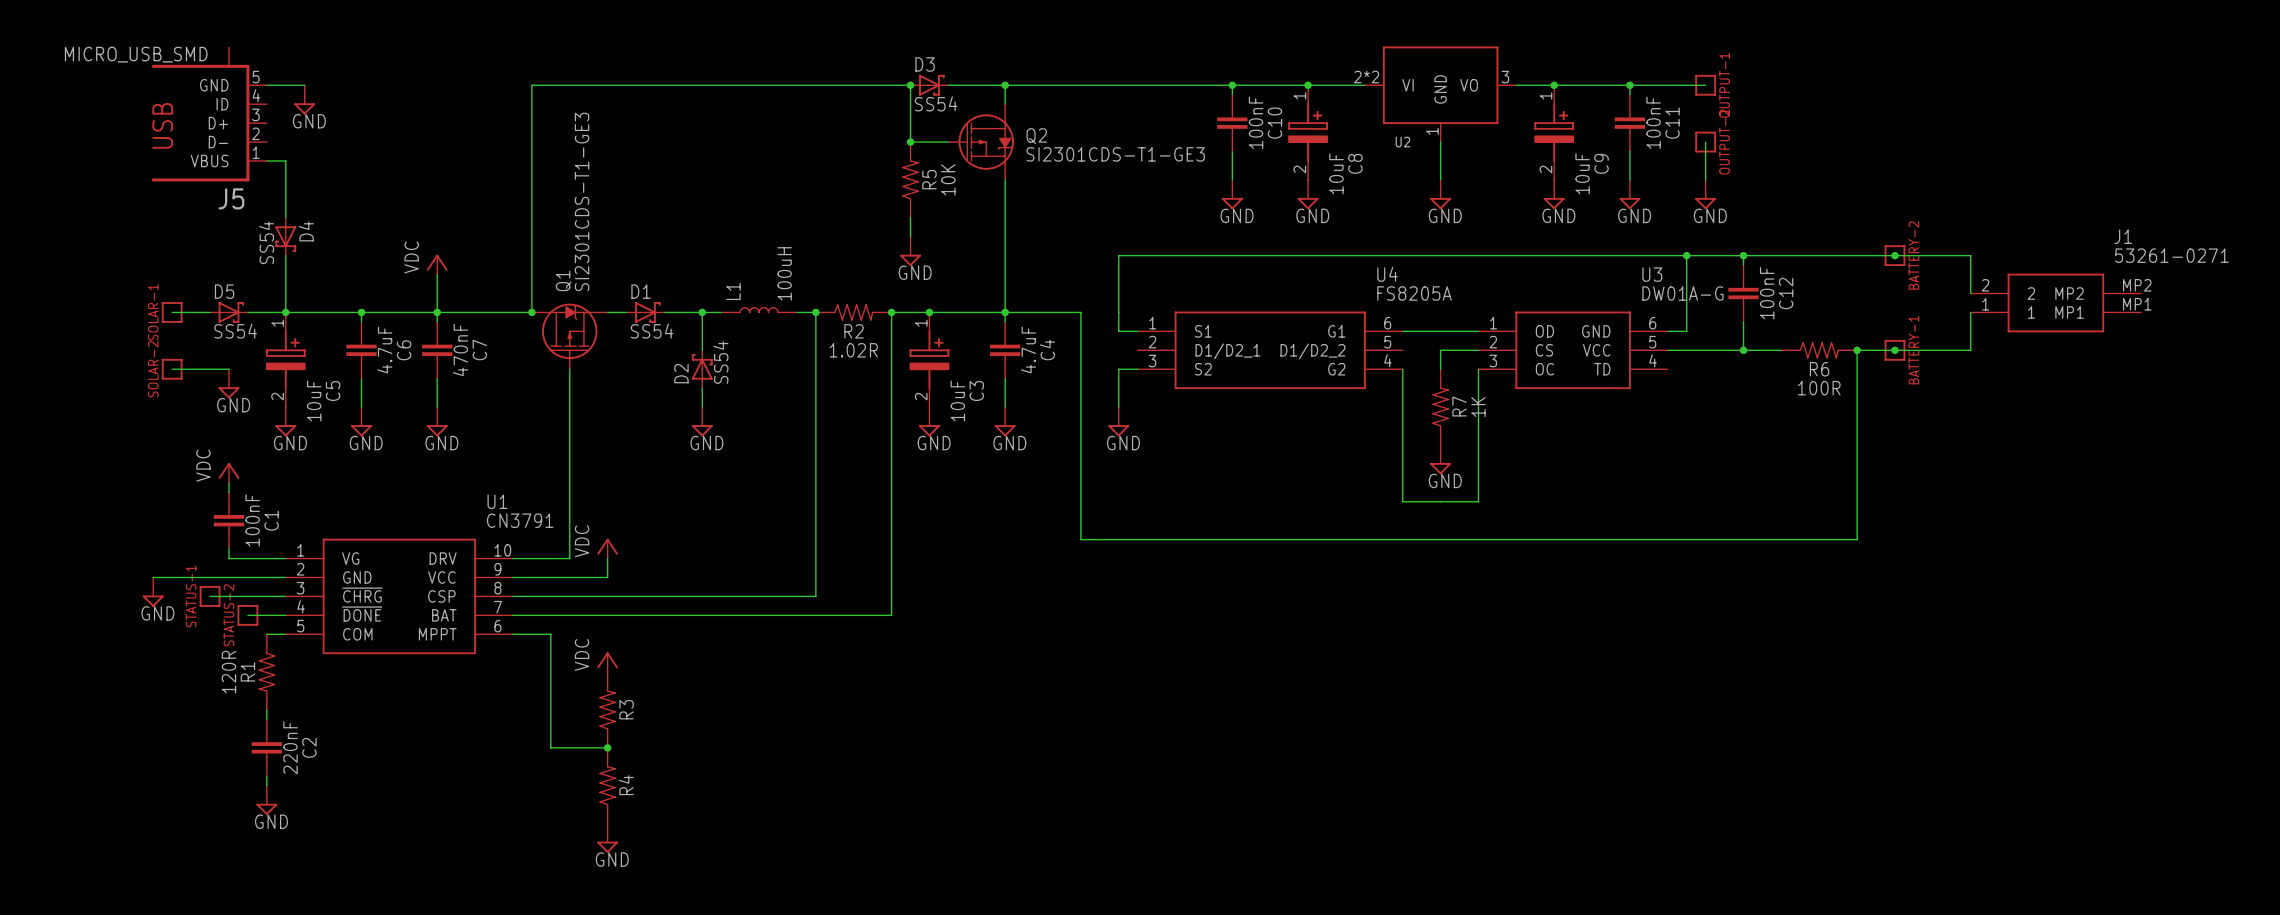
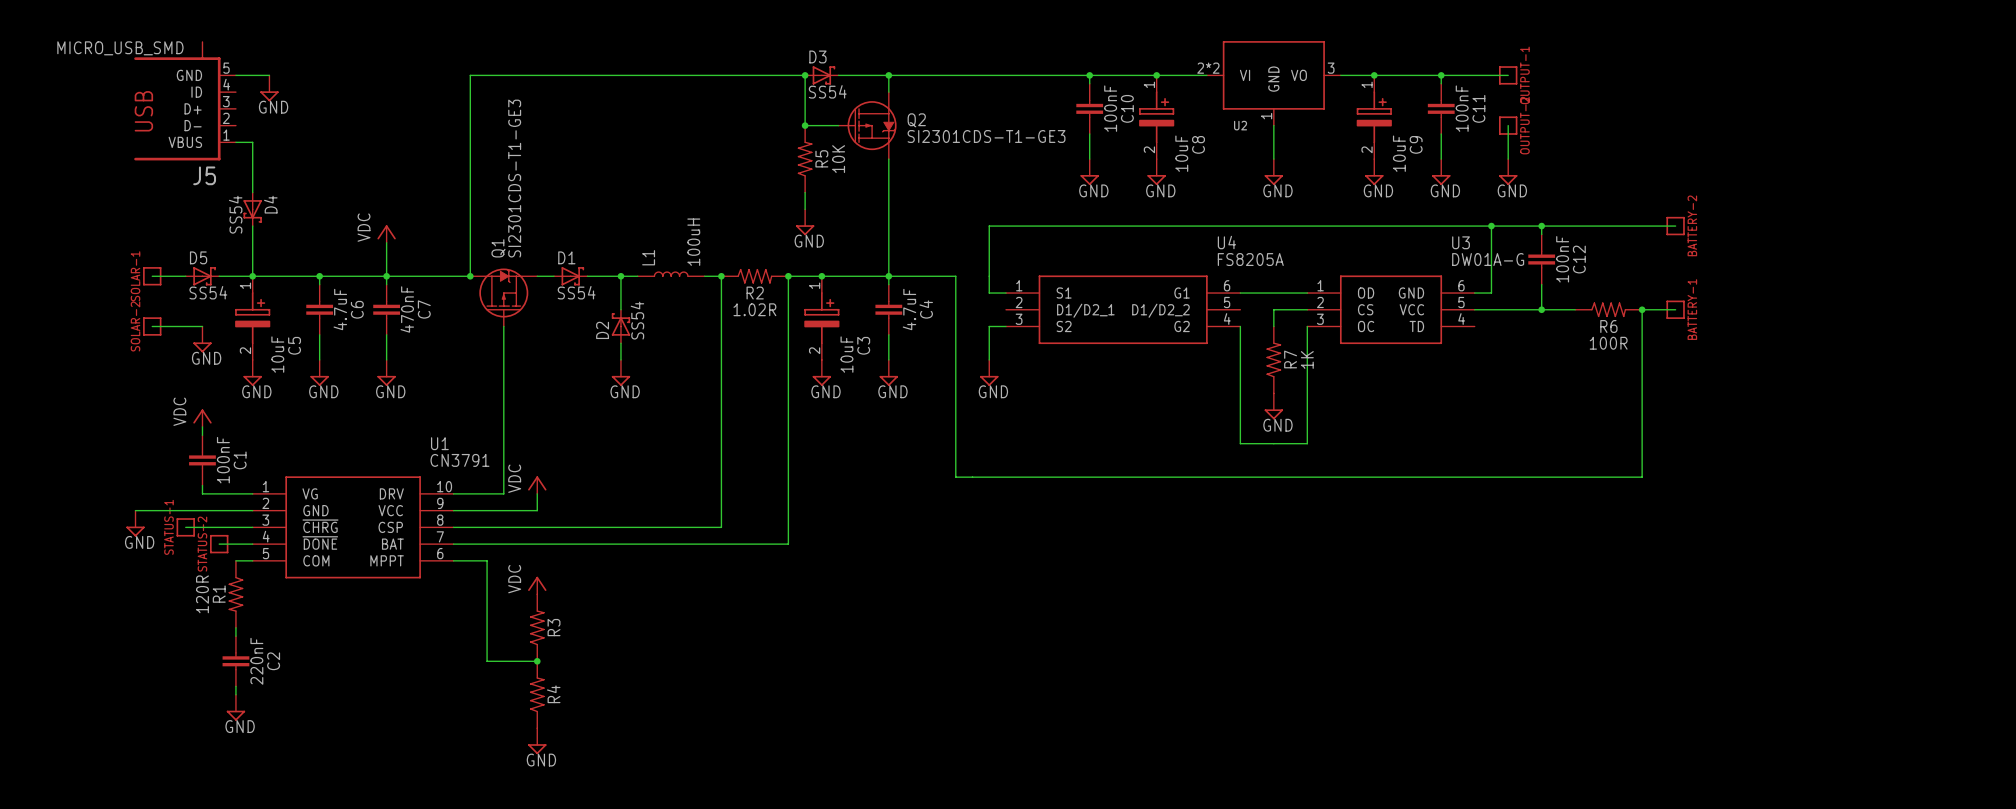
wire: (1894, 255) (1970, 255) (1970, 293) -> none
junction: (1894, 255) -> none
J1: 53261-0271 (2055, 302) -> none
wire: (1970, 312) (1970, 350) (1894, 350) -> none
junction: (1894, 350) -> none

